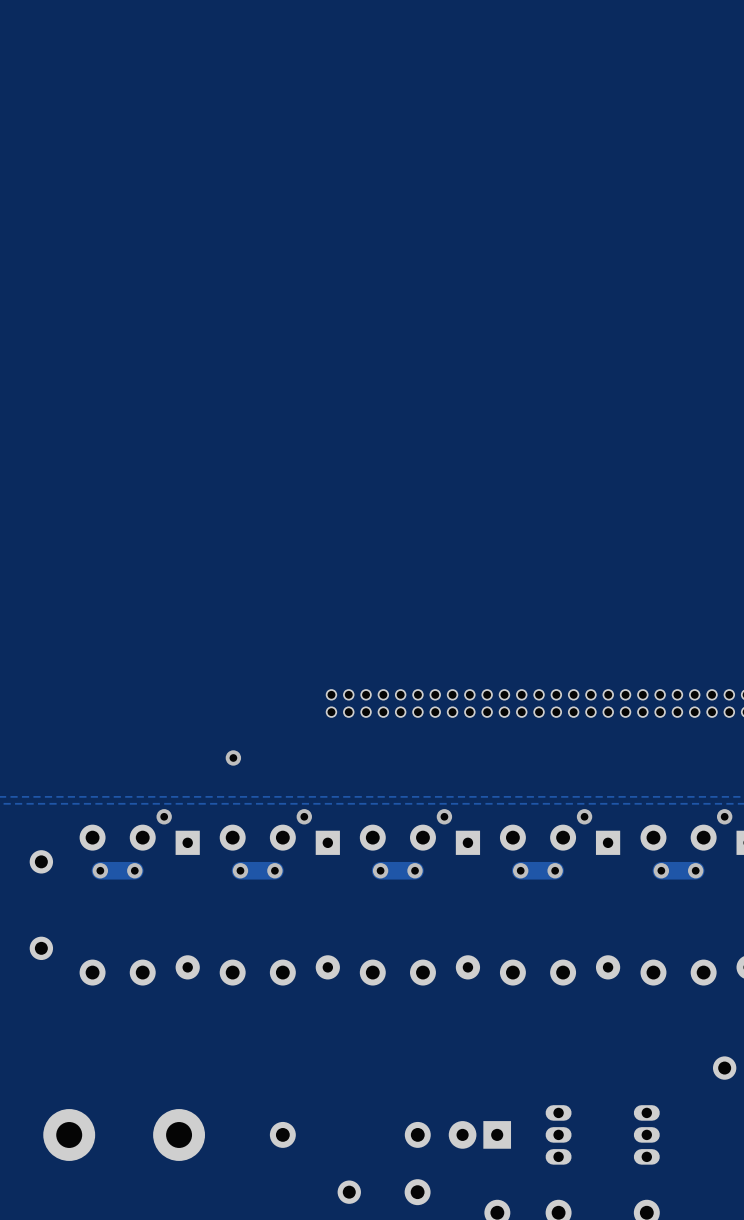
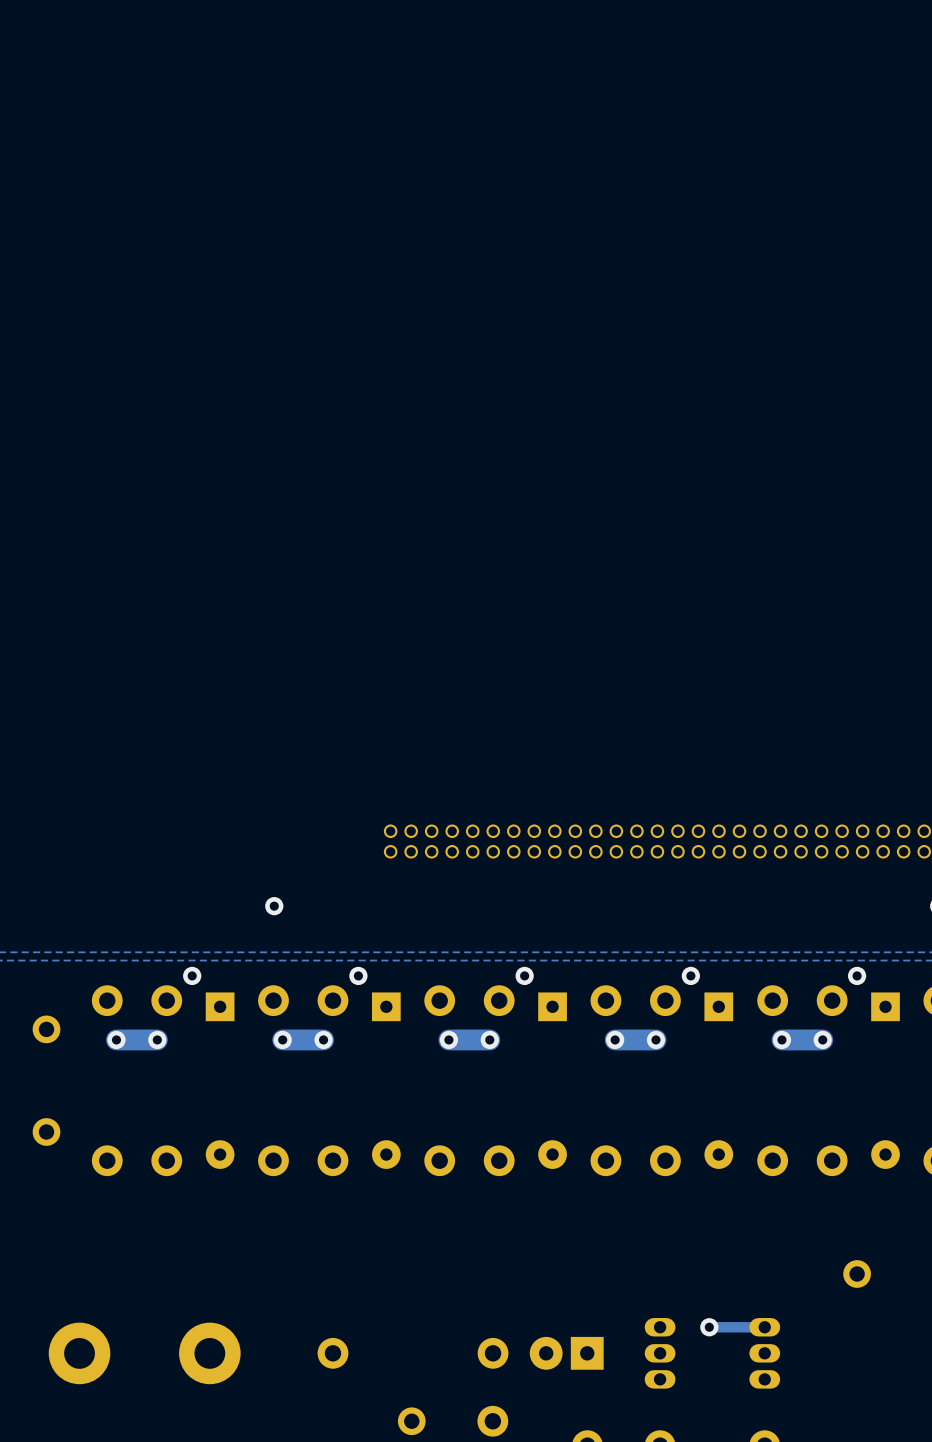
via: none -> (709, 1327)
track: none -> (764, 1327) (709, 1327)

